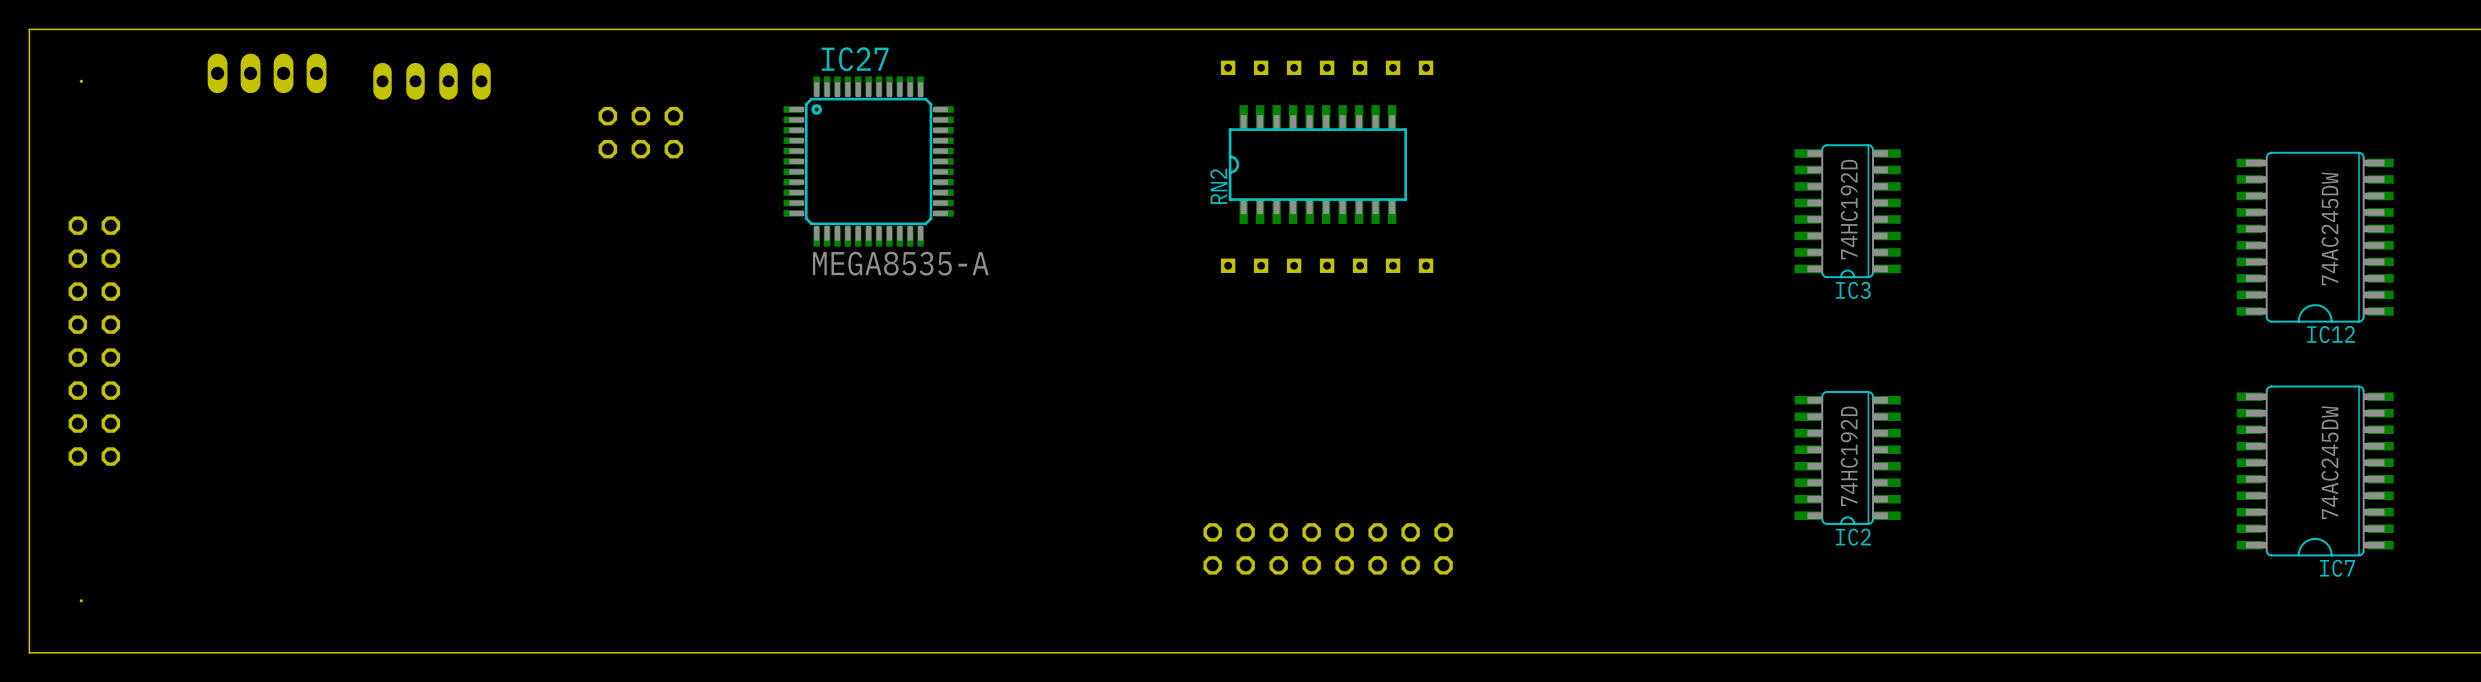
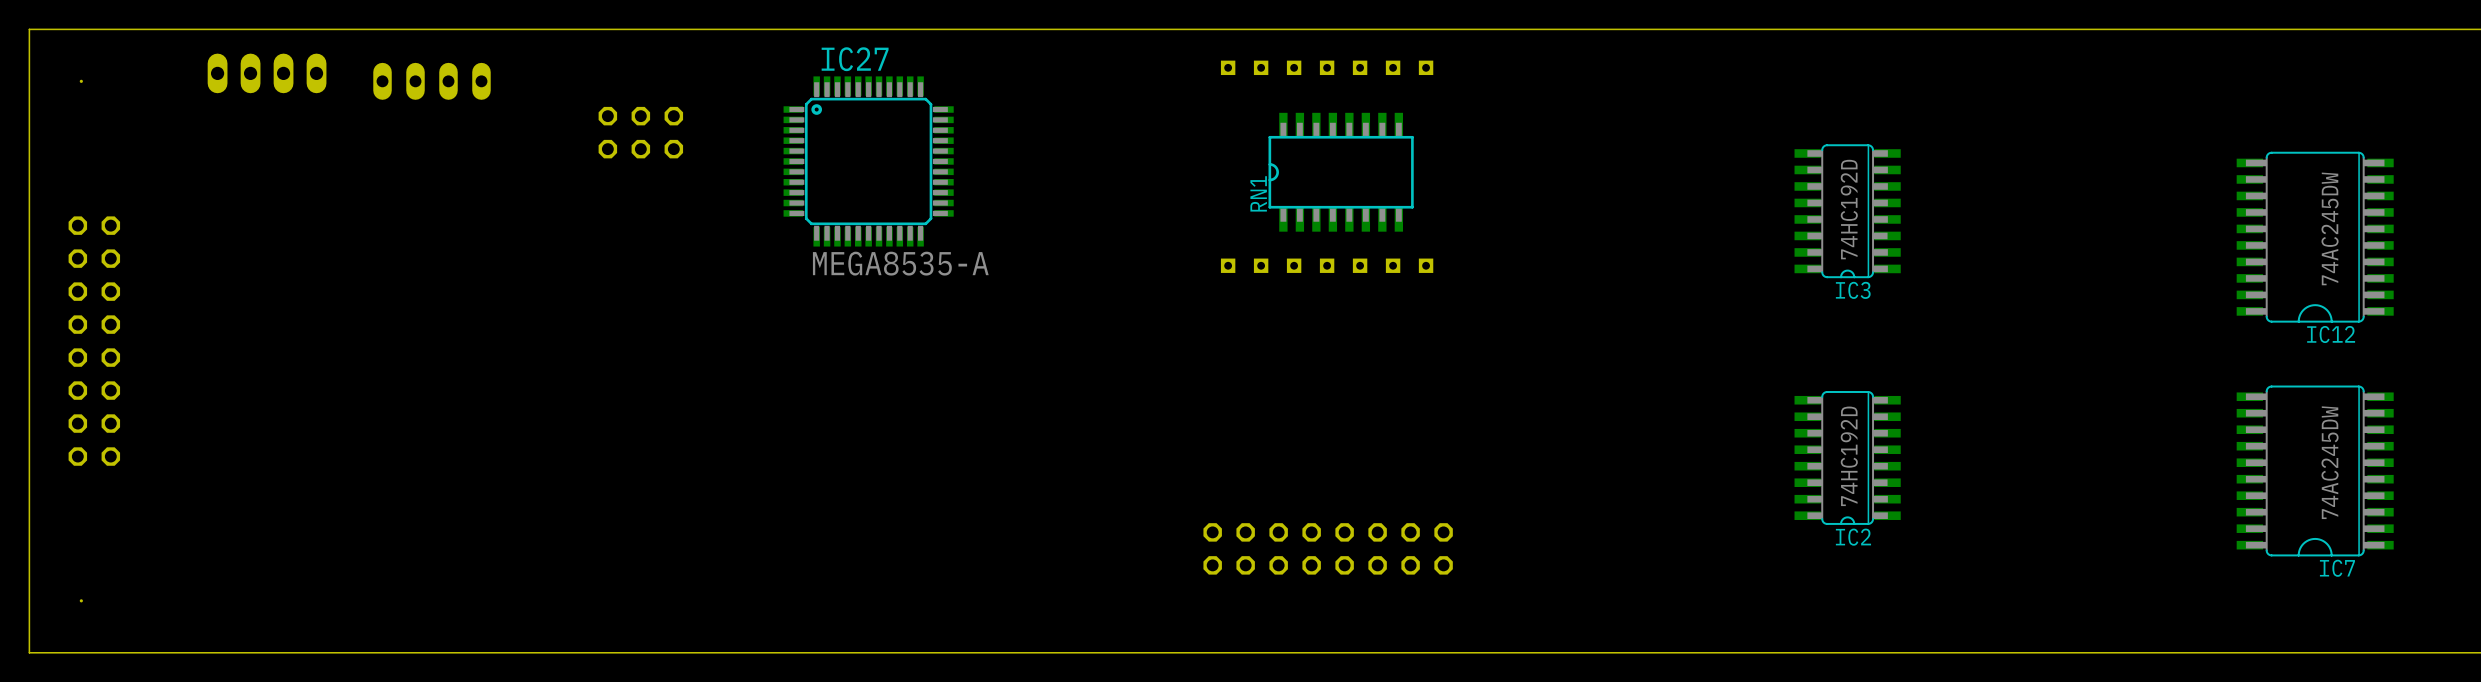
RN2: (1317, 164) -> none
RN1: none -> (1341, 172)

